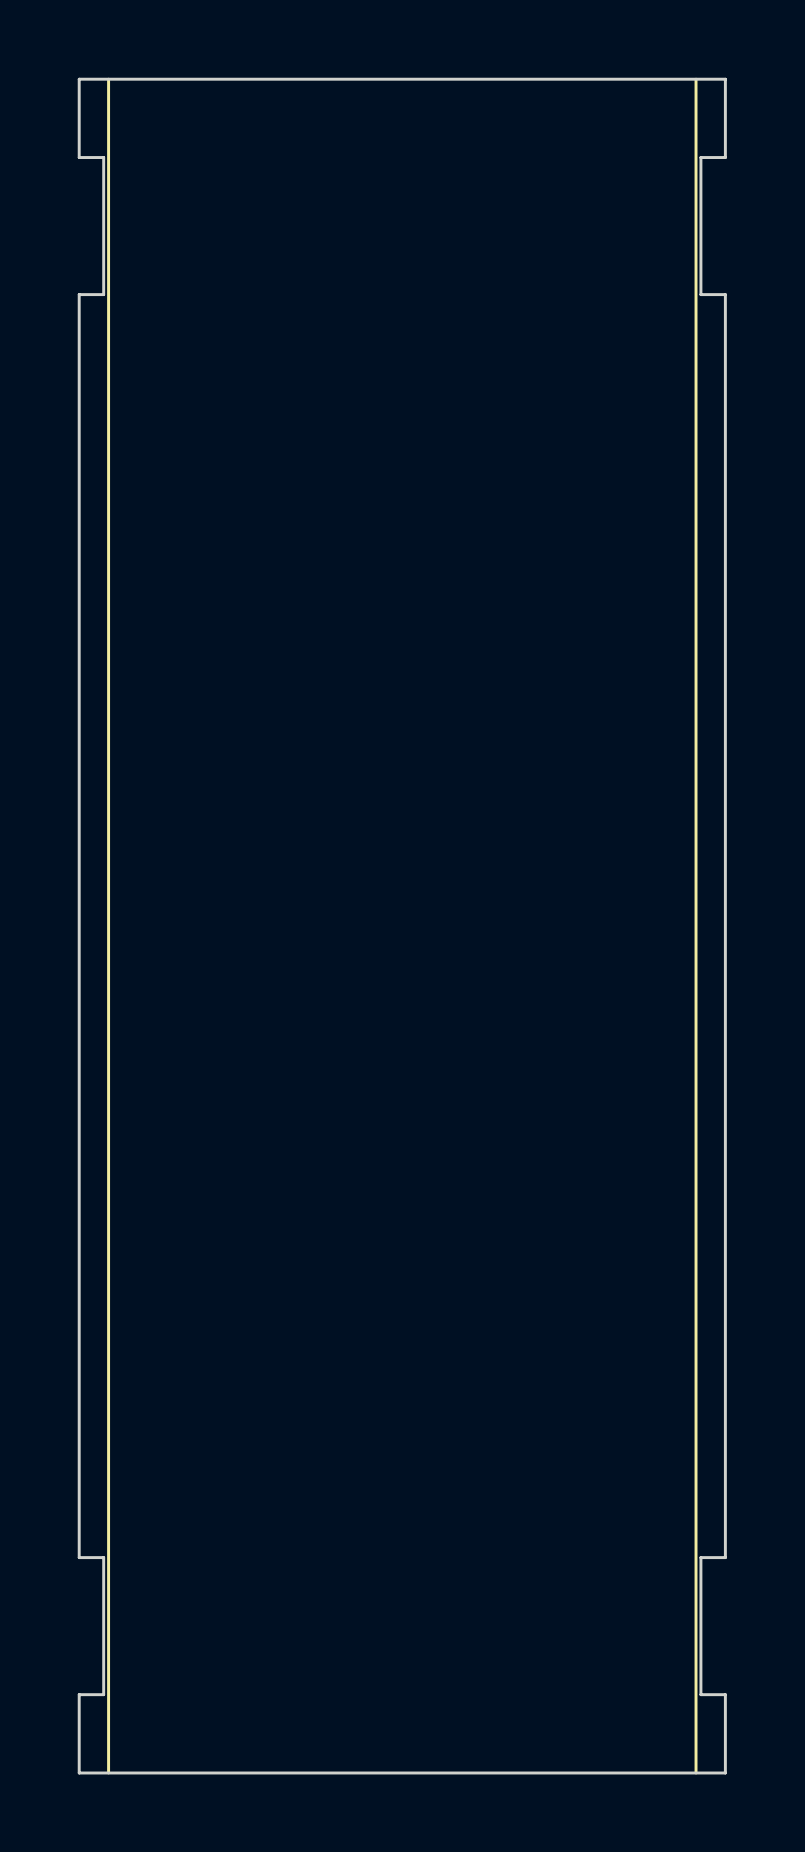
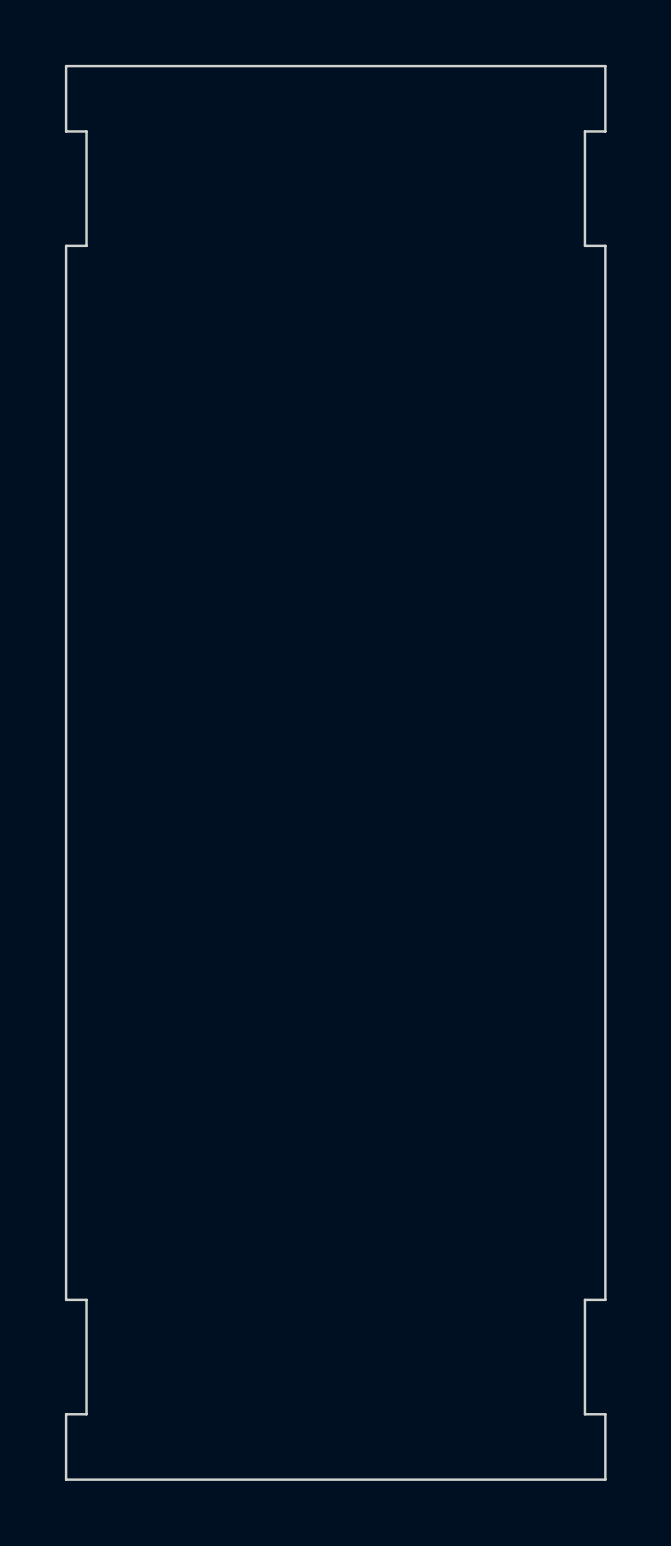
line: (108, 79) (108, 1772) -> none
line: (696, 79) (696, 1772) -> none

